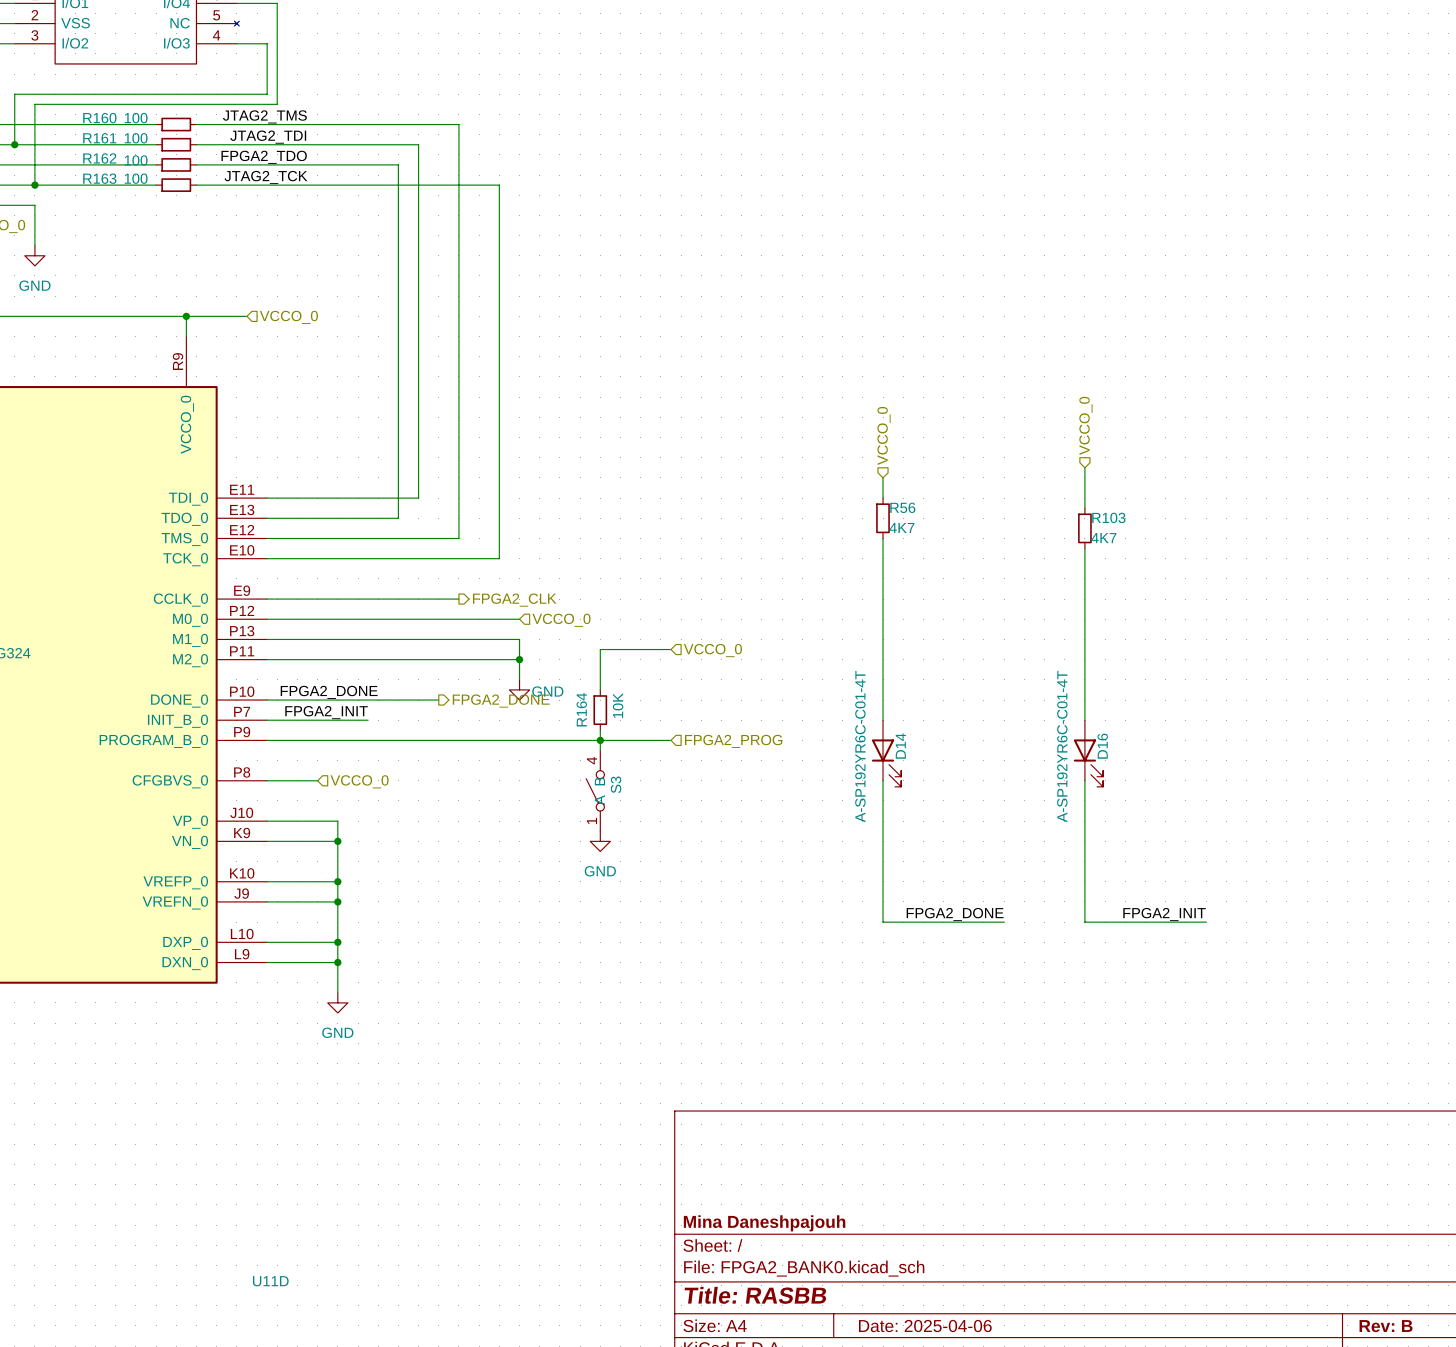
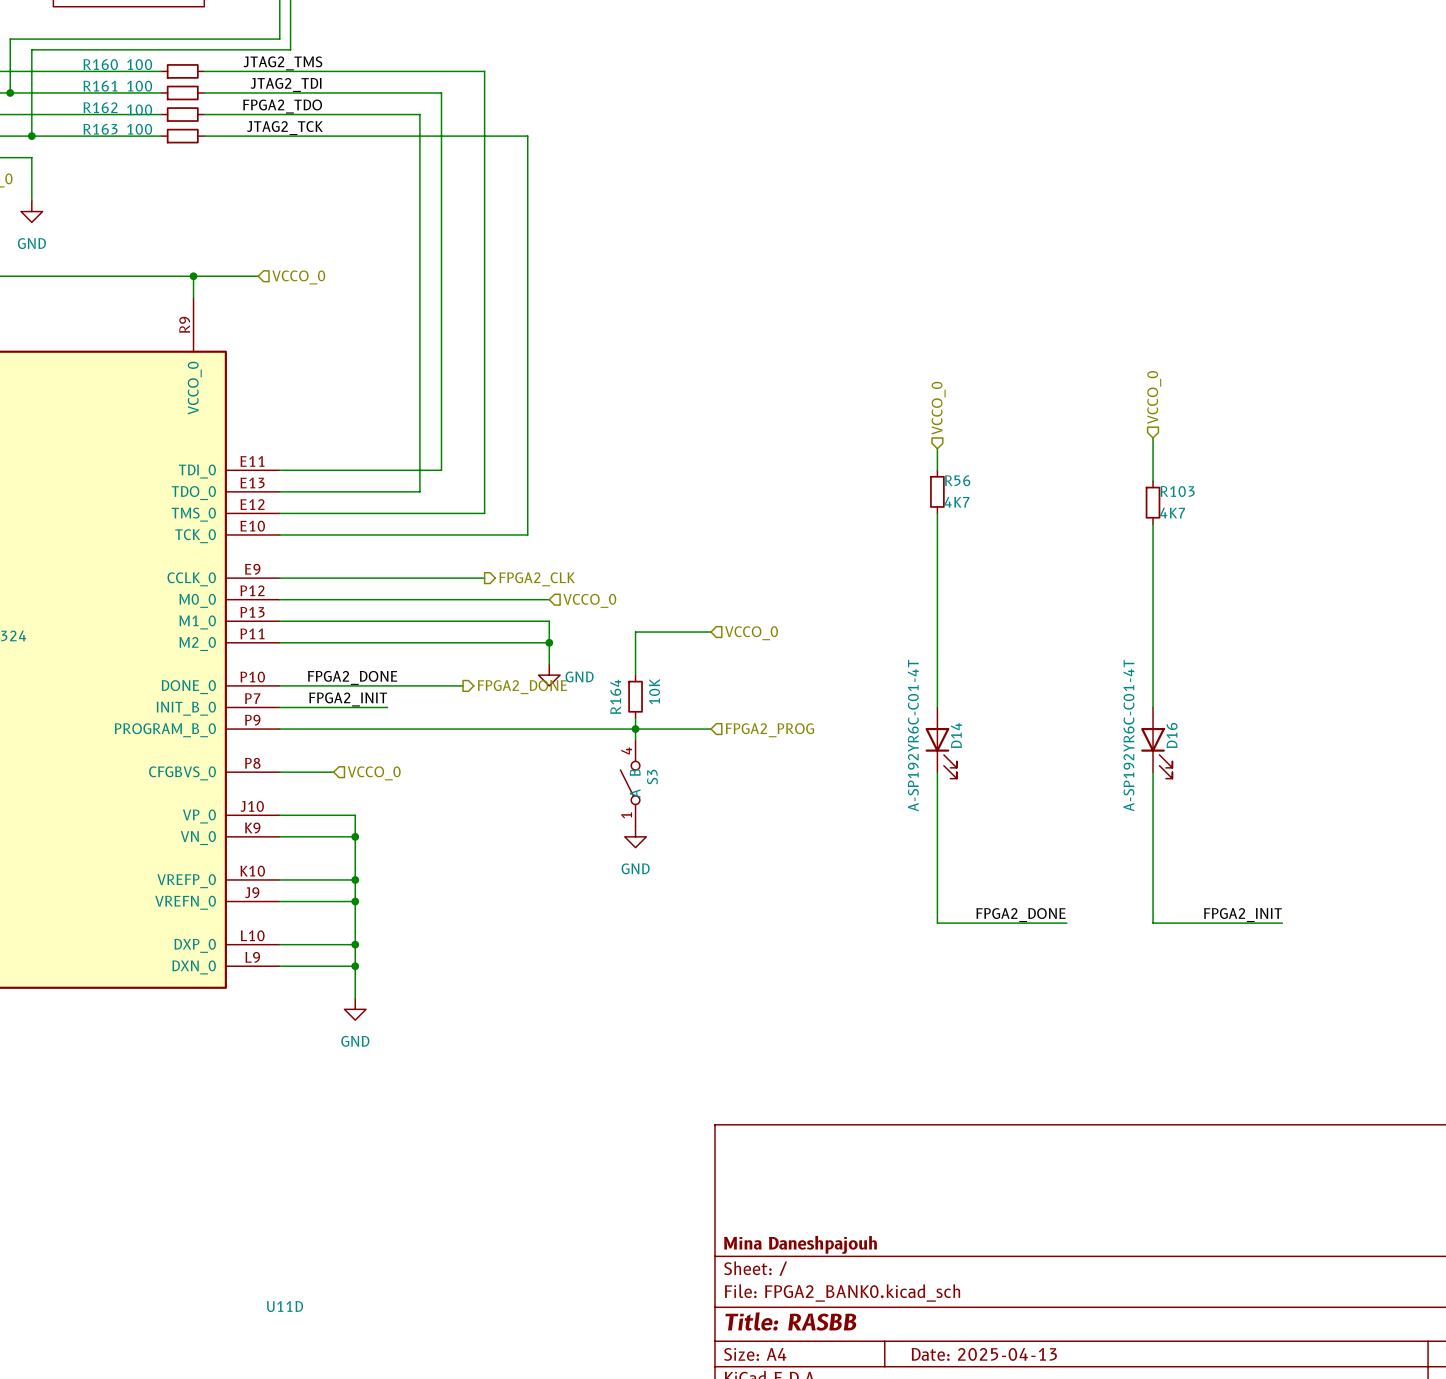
title block: Date: 2025-04-06 (925, 1326) -> Date: 2025-04-13 (984, 1354)

